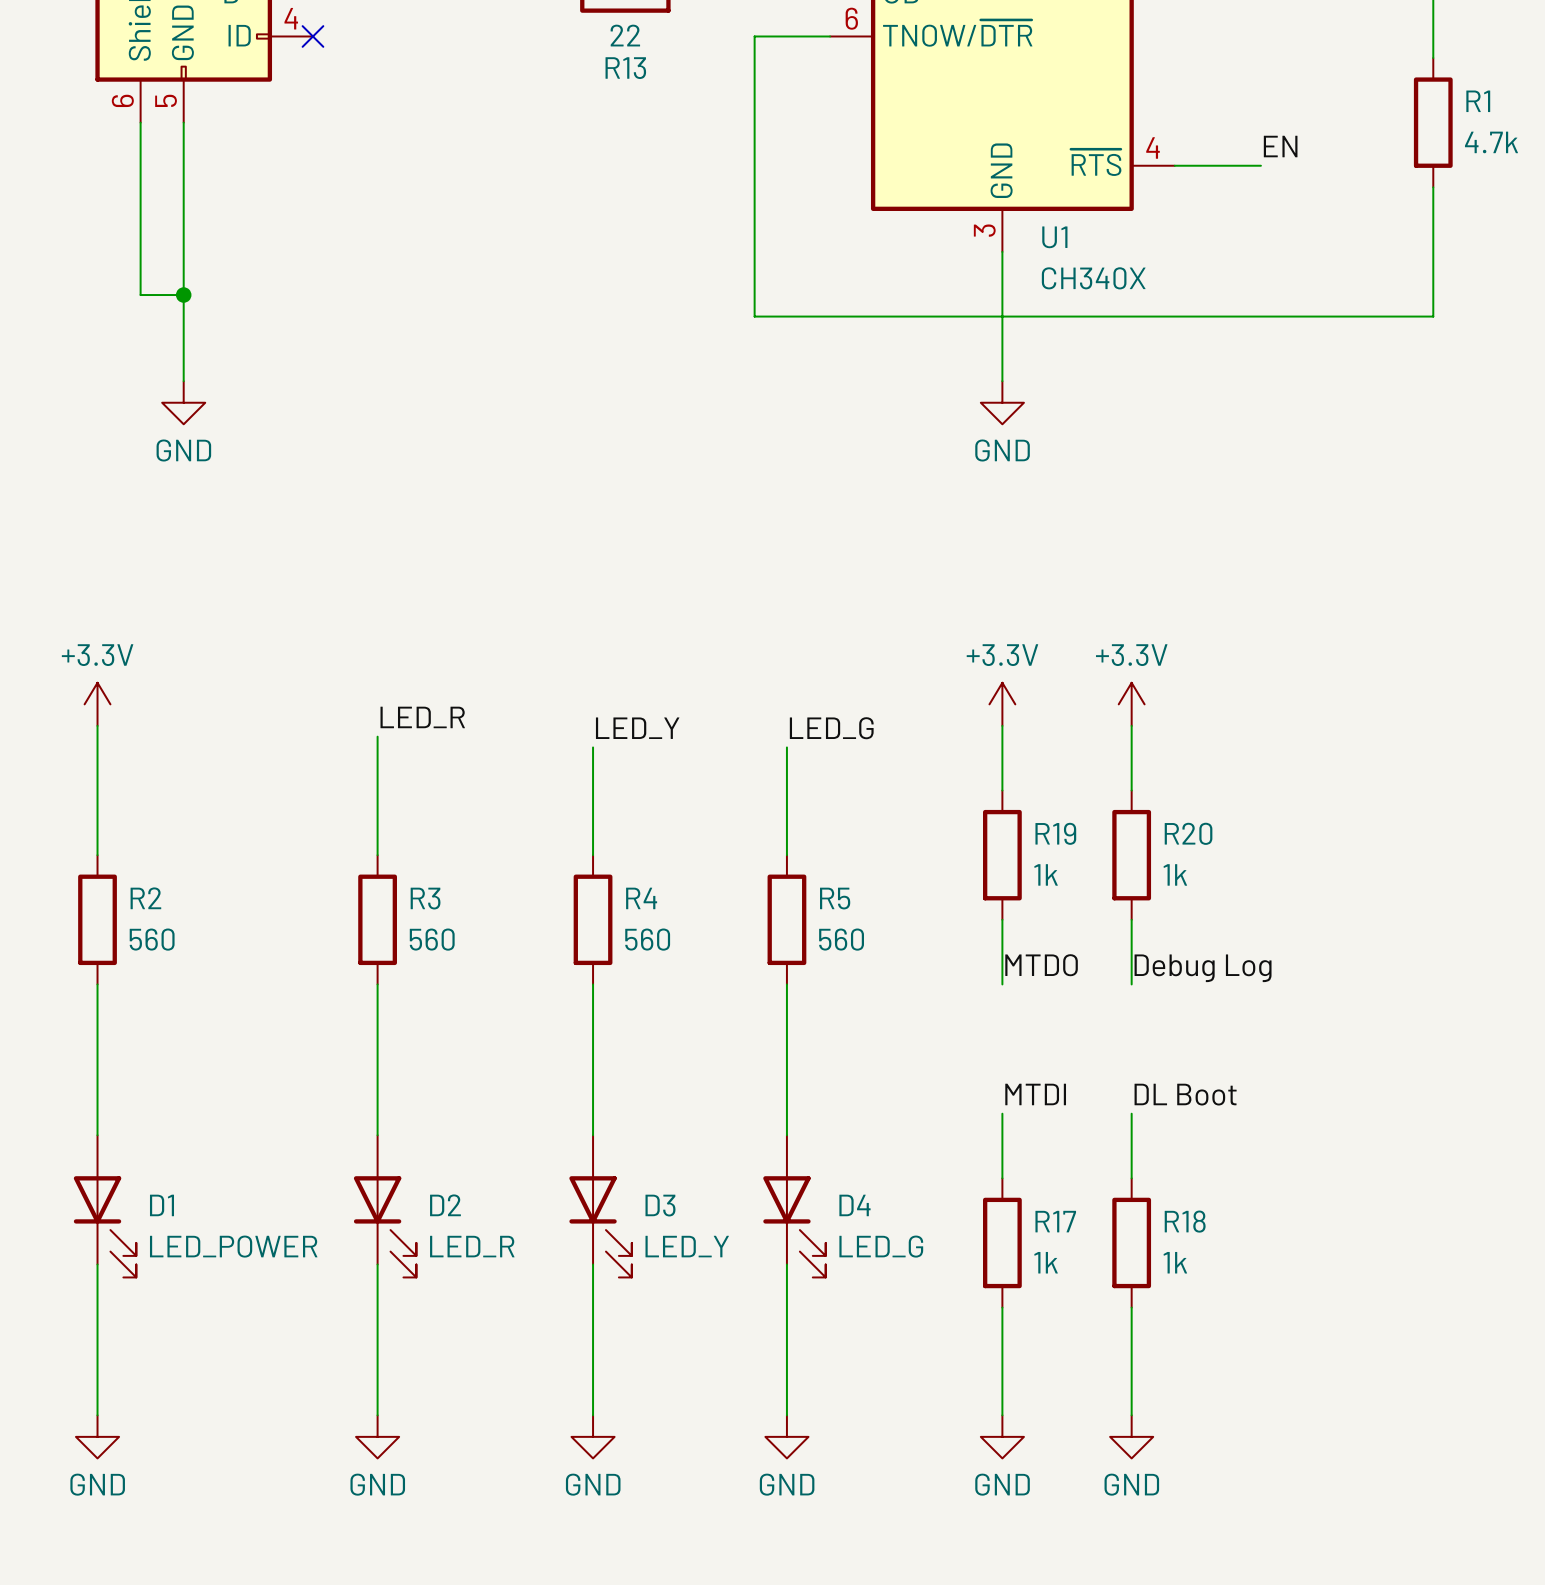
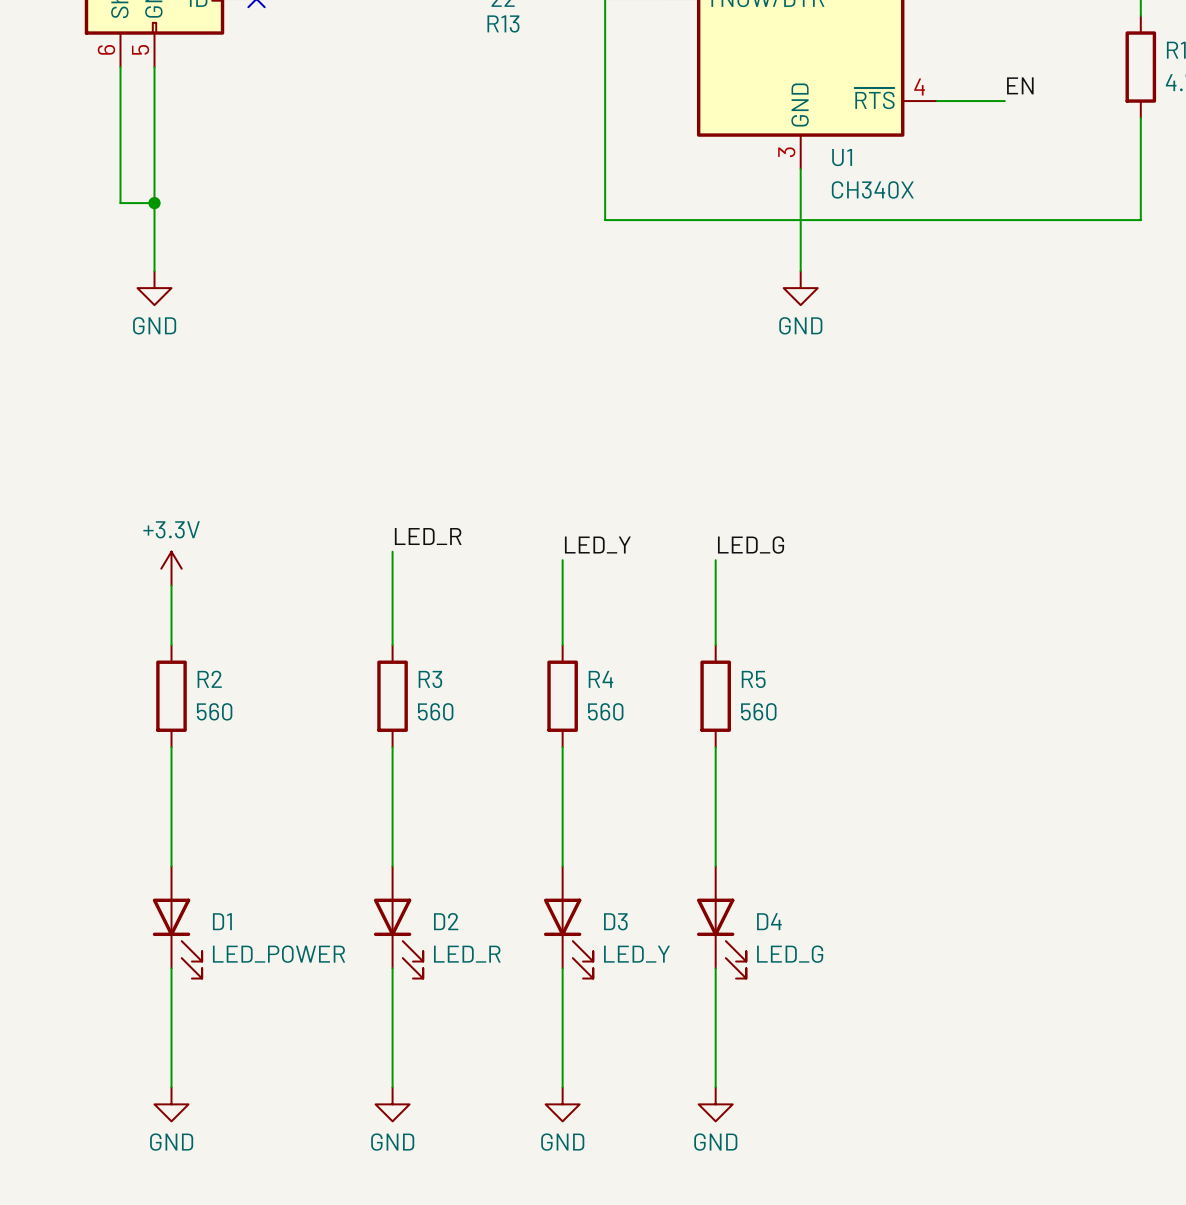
power symbol position: +3.3V (97, 704) -> +3.3V (171, 568)
power symbol: +3.3V (1002, 704) -> none
power symbol: +3.3V (1131, 704) -> none
label position: LED_R (422, 717) -> LED_R (428, 536)
wire: (97, 725) (97, 855) -> none
wire: (1002, 725) (1002, 790) -> none
wire: (1131, 725) (1131, 790) -> none
label position: LED_Y (637, 728) -> LED_Y (597, 545)
label position: LED_G (831, 728) -> LED_G (751, 545)
wire: (377, 736) (377, 855) -> (392, 551) (392, 645)
wire: (593, 747) (593, 855) -> (562, 560) (562, 645)
wire: (786, 747) (786, 855) -> (715, 560) (715, 645)
wire: none -> (171, 585) (171, 645)
R19: 1k (1002, 855) -> none
R20: 1k (1131, 855) -> none
R2 position: (97, 919) -> (171, 696)
R3 position: (377, 919) -> (392, 696)
R4 position: (593, 919) -> (562, 696)
R5 position: (786, 919) -> (715, 696)
wire: (1002, 919) (1002, 984) -> none
wire: (1131, 919) (1131, 984) -> none
label: MTDO (1041, 965) -> none
label: Debug Log (1203, 968) -> none
wire: (97, 984) (97, 1135) -> (171, 747) (171, 866)
wire: (377, 984) (377, 1135) -> (392, 747) (392, 866)
wire: (593, 984) (593, 1135) -> (562, 747) (562, 866)
wire: (786, 984) (786, 1135) -> (715, 747) (715, 866)
label: MTDI (1035, 1094) -> none
label: DL Boot (1185, 1094) -> none
wire: (1002, 1113) (1002, 1178) -> none
wire: (1131, 1113) (1131, 1178) -> none
D1 position: (105, 1206) -> (177, 922)
D2 position: (385, 1206) -> (398, 922)
D3 position: (600, 1206) -> (568, 922)
D4 position: (794, 1206) -> (721, 922)
R17: 1k (1002, 1242) -> none
R18: 1k (1131, 1242) -> none
wire: (97, 1264) (97, 1415) -> (171, 968) (171, 1087)
wire: (377, 1264) (377, 1415) -> (392, 968) (392, 1087)
wire: (593, 1264) (593, 1415) -> (562, 968) (562, 1087)
wire: (786, 1264) (786, 1415) -> (715, 968) (715, 1087)
wire: (1002, 1307) (1002, 1415) -> none
wire: (1131, 1307) (1131, 1415) -> none
power symbol: GND (97, 1436) -> none
power symbol: none -> GND (171, 1104)
power symbol: GND (377, 1436) -> none
power symbol: none -> GND (392, 1104)
power symbol: GND (593, 1436) -> none
power symbol: none -> GND (562, 1104)
power symbol: GND (786, 1436) -> none
power symbol: none -> GND (715, 1104)
power symbol: GND (1002, 1436) -> none
power symbol: GND (1131, 1436) -> none

